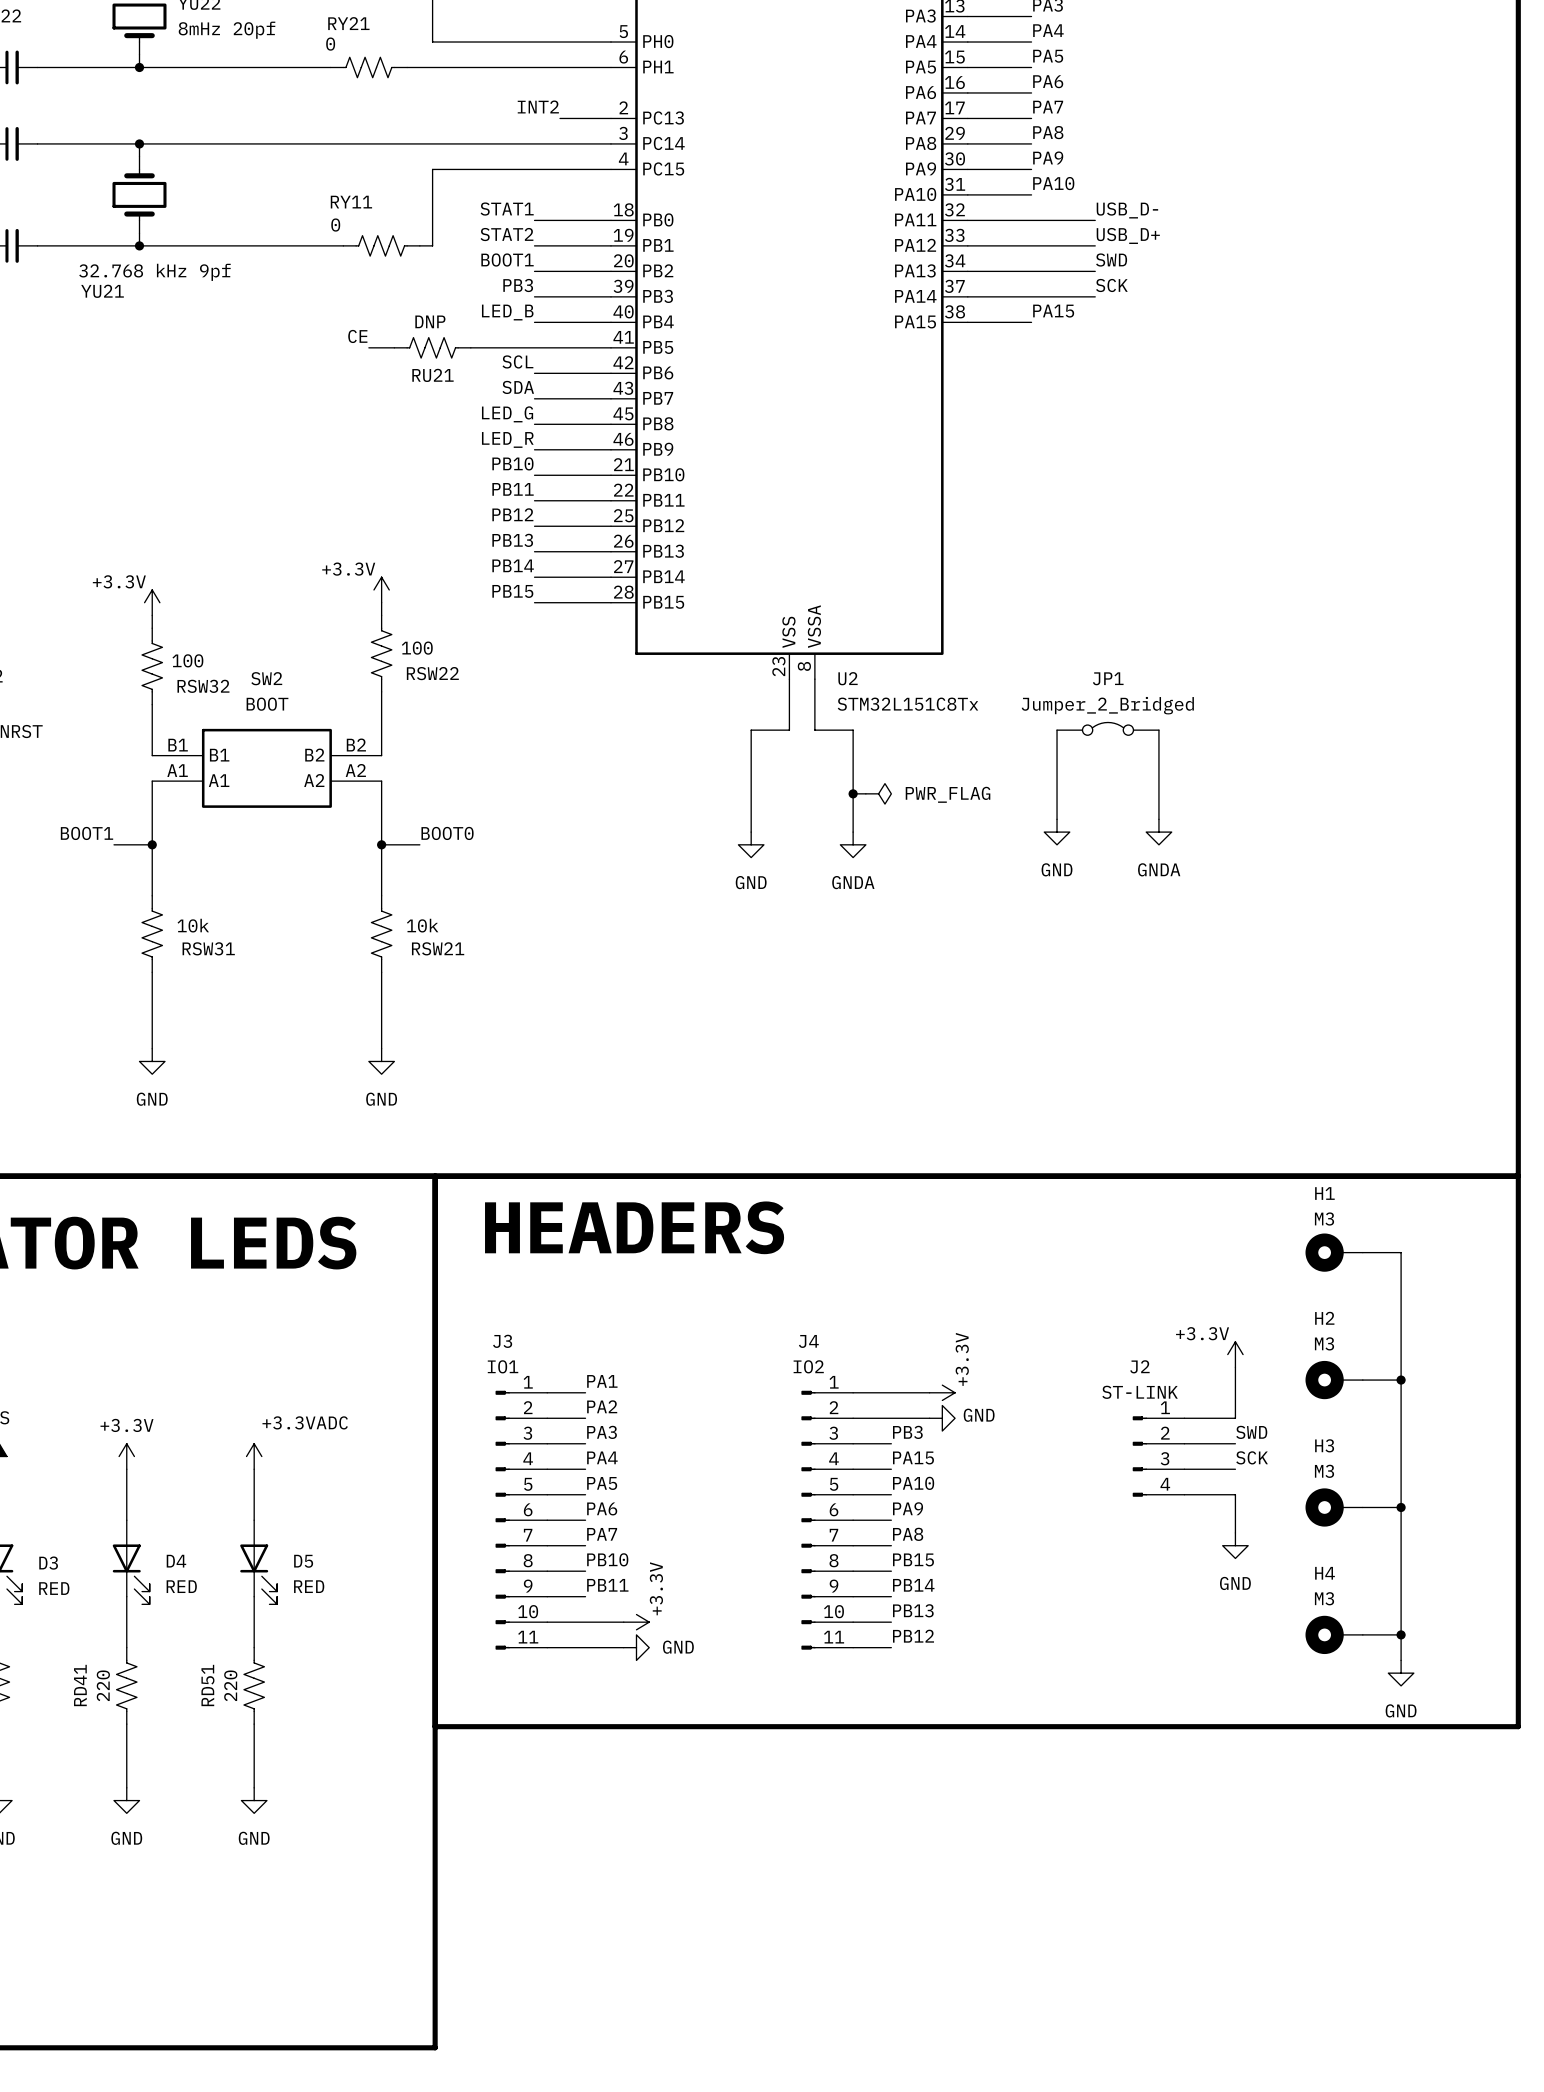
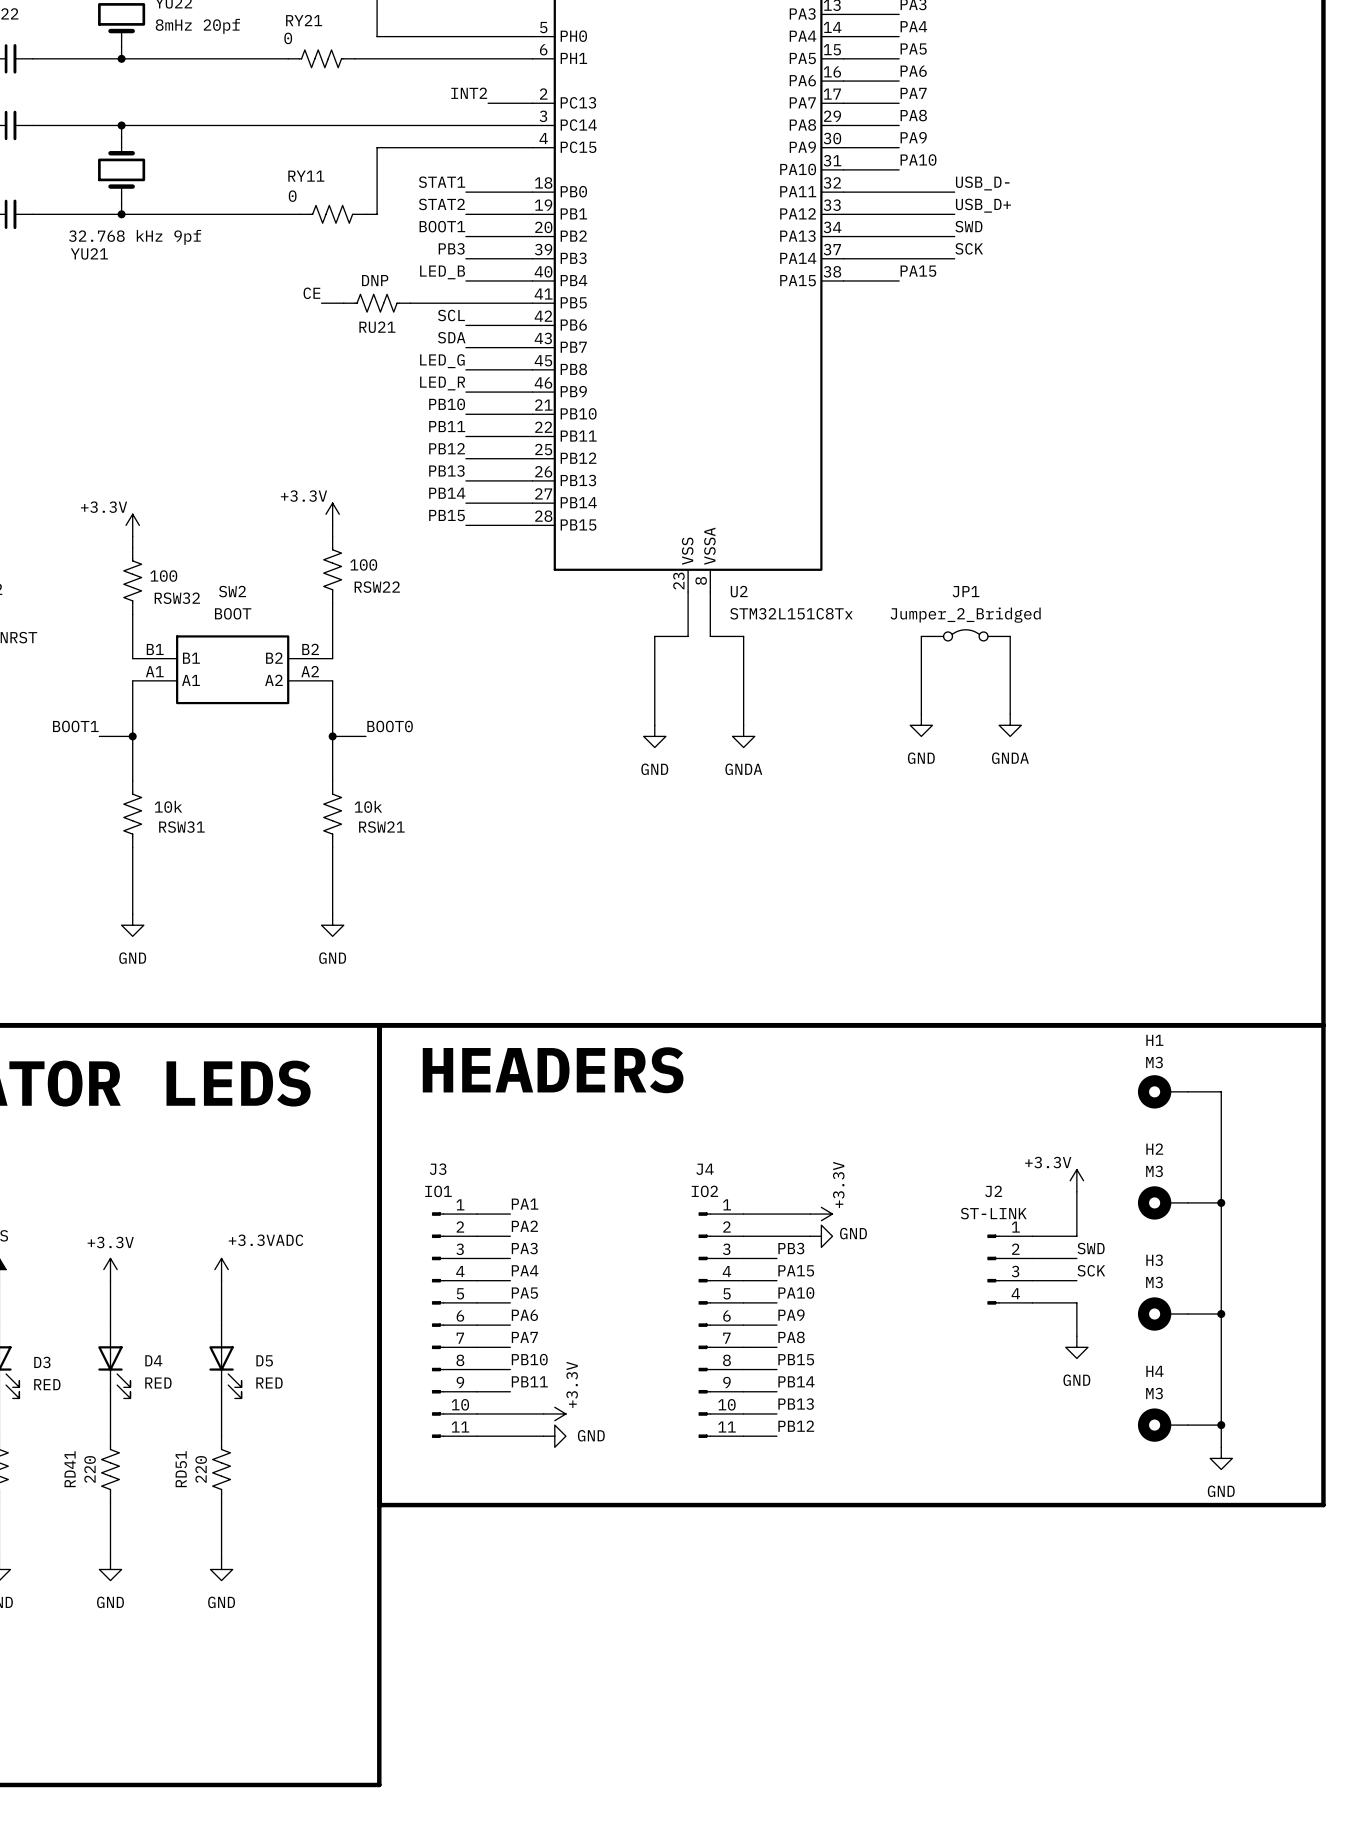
wire: (853, 793) (865, 793) -> none
junction: (853, 793) -> none
power symbol: PWR_FLAG (878, 793) -> none

